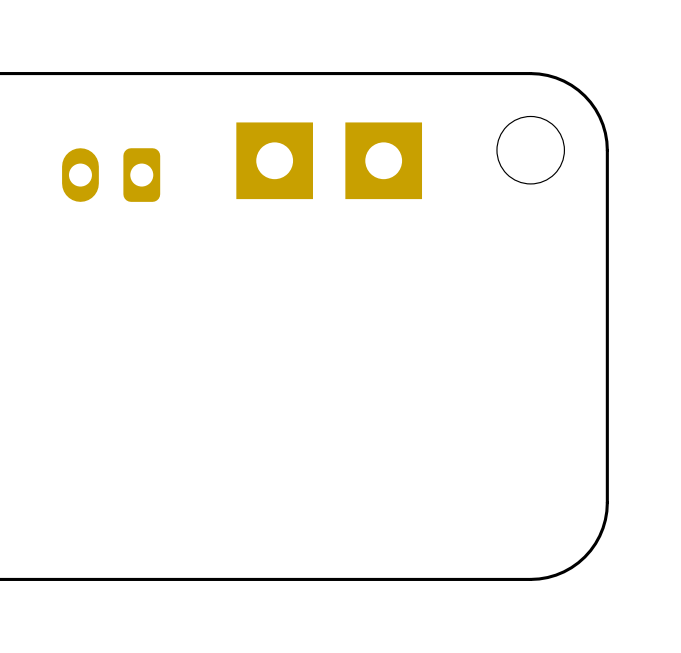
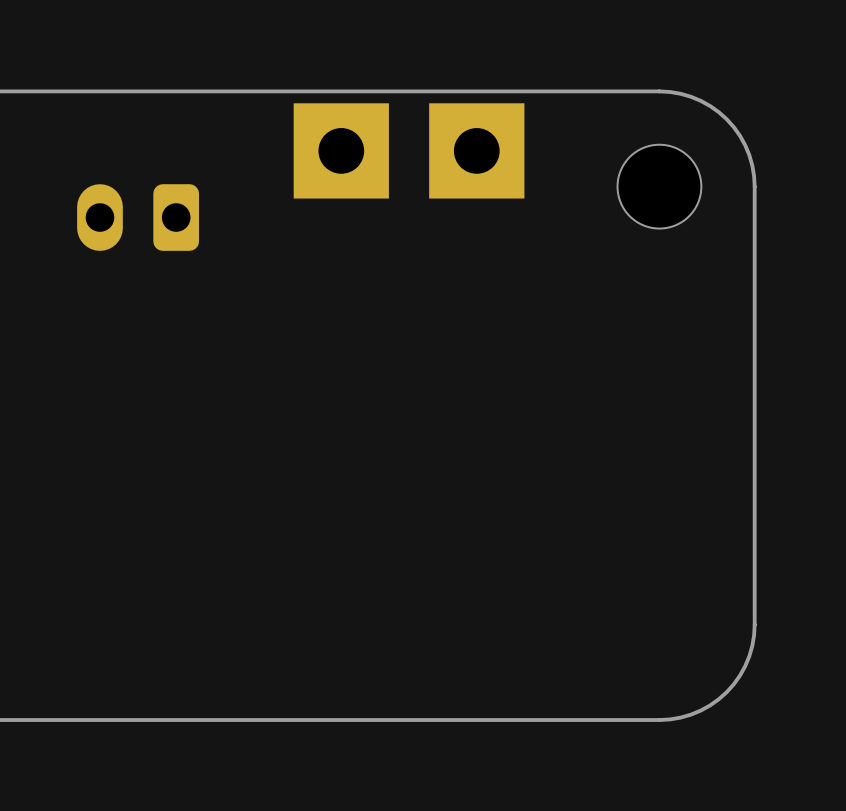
part position: (274, 160) -> (341, 150)
part position: (383, 160) -> (476, 150)

